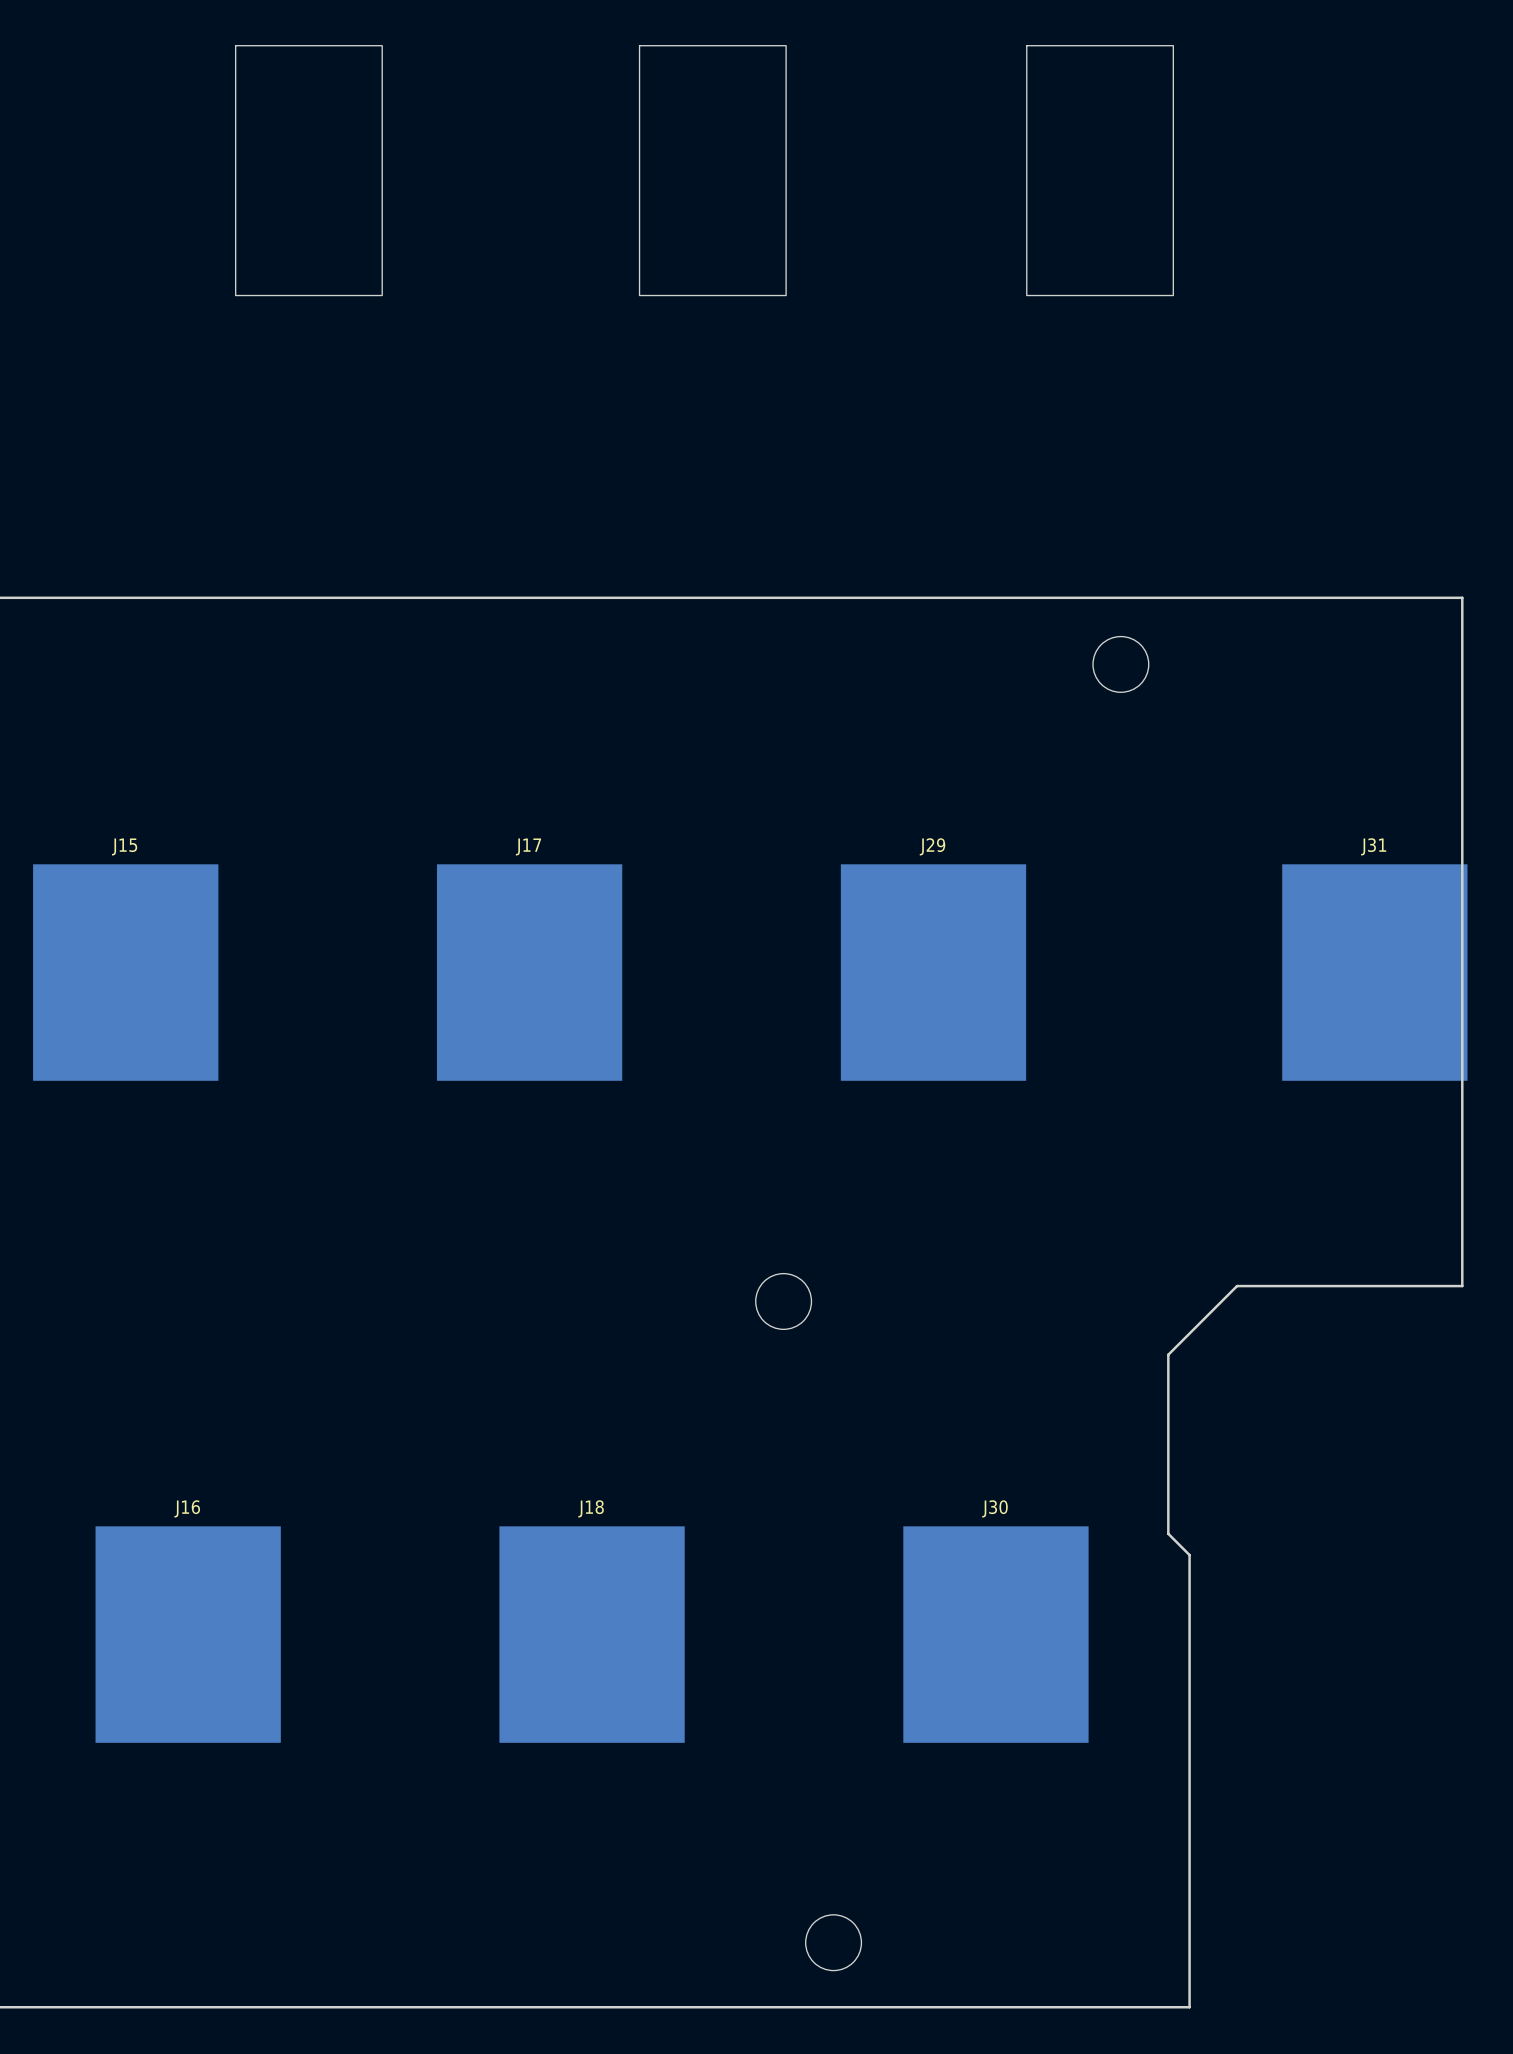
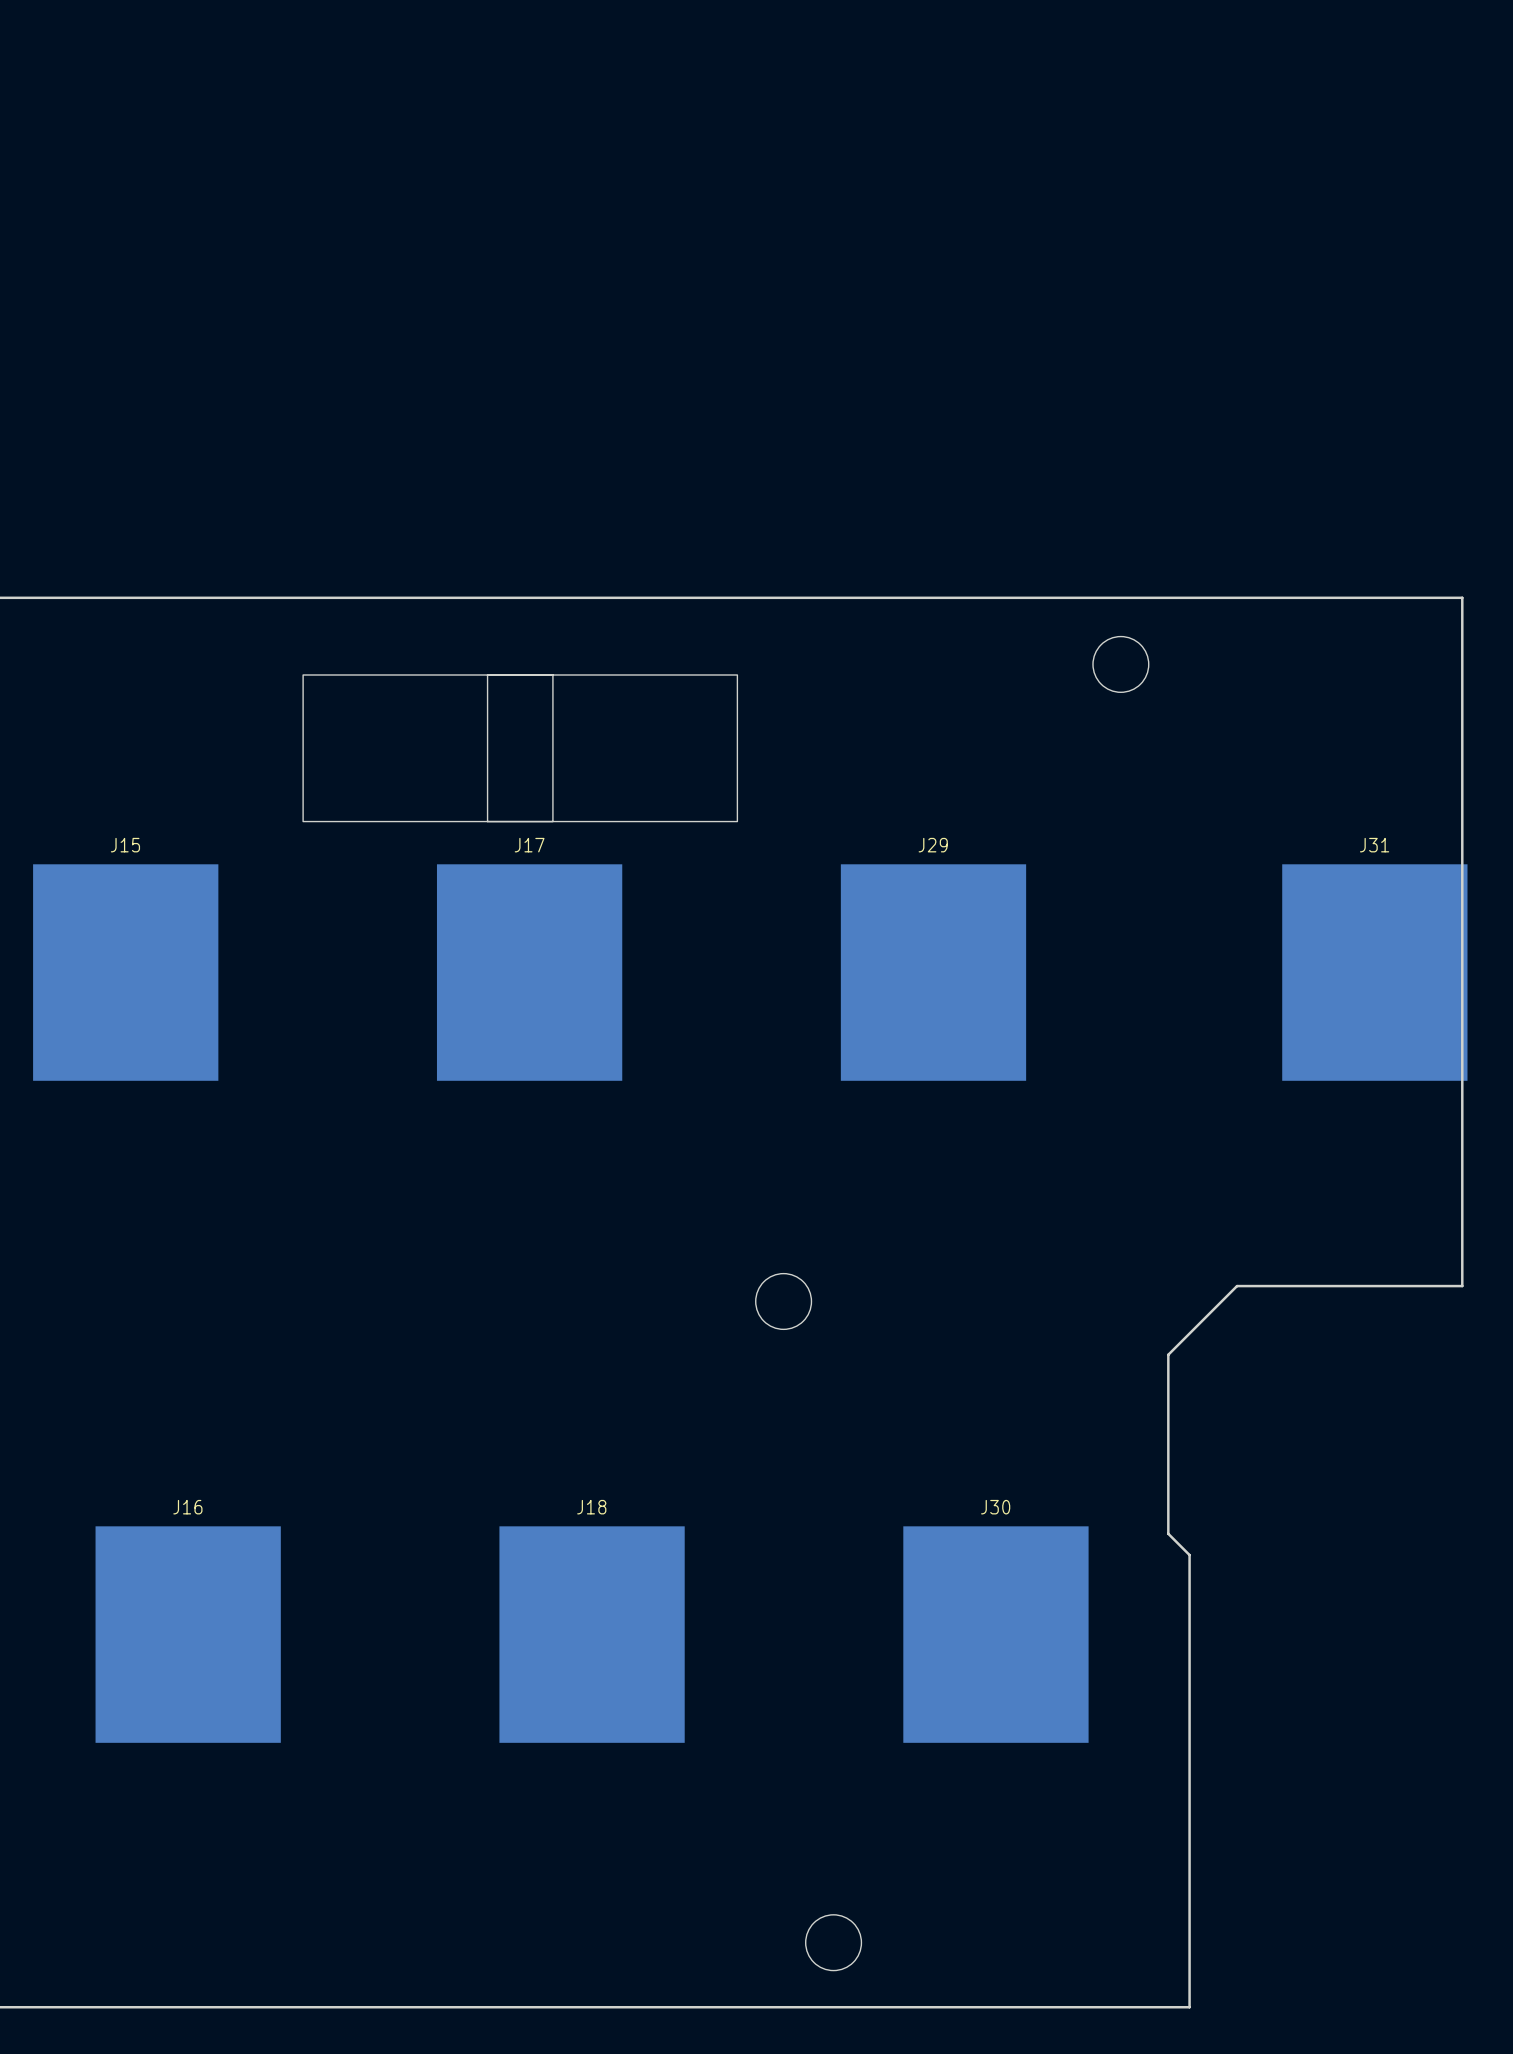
part: (308, 170) -> none
part: (712, 170) -> none
part: (1100, 170) -> none
part: none -> (428, 748)
part: none -> (612, 748)

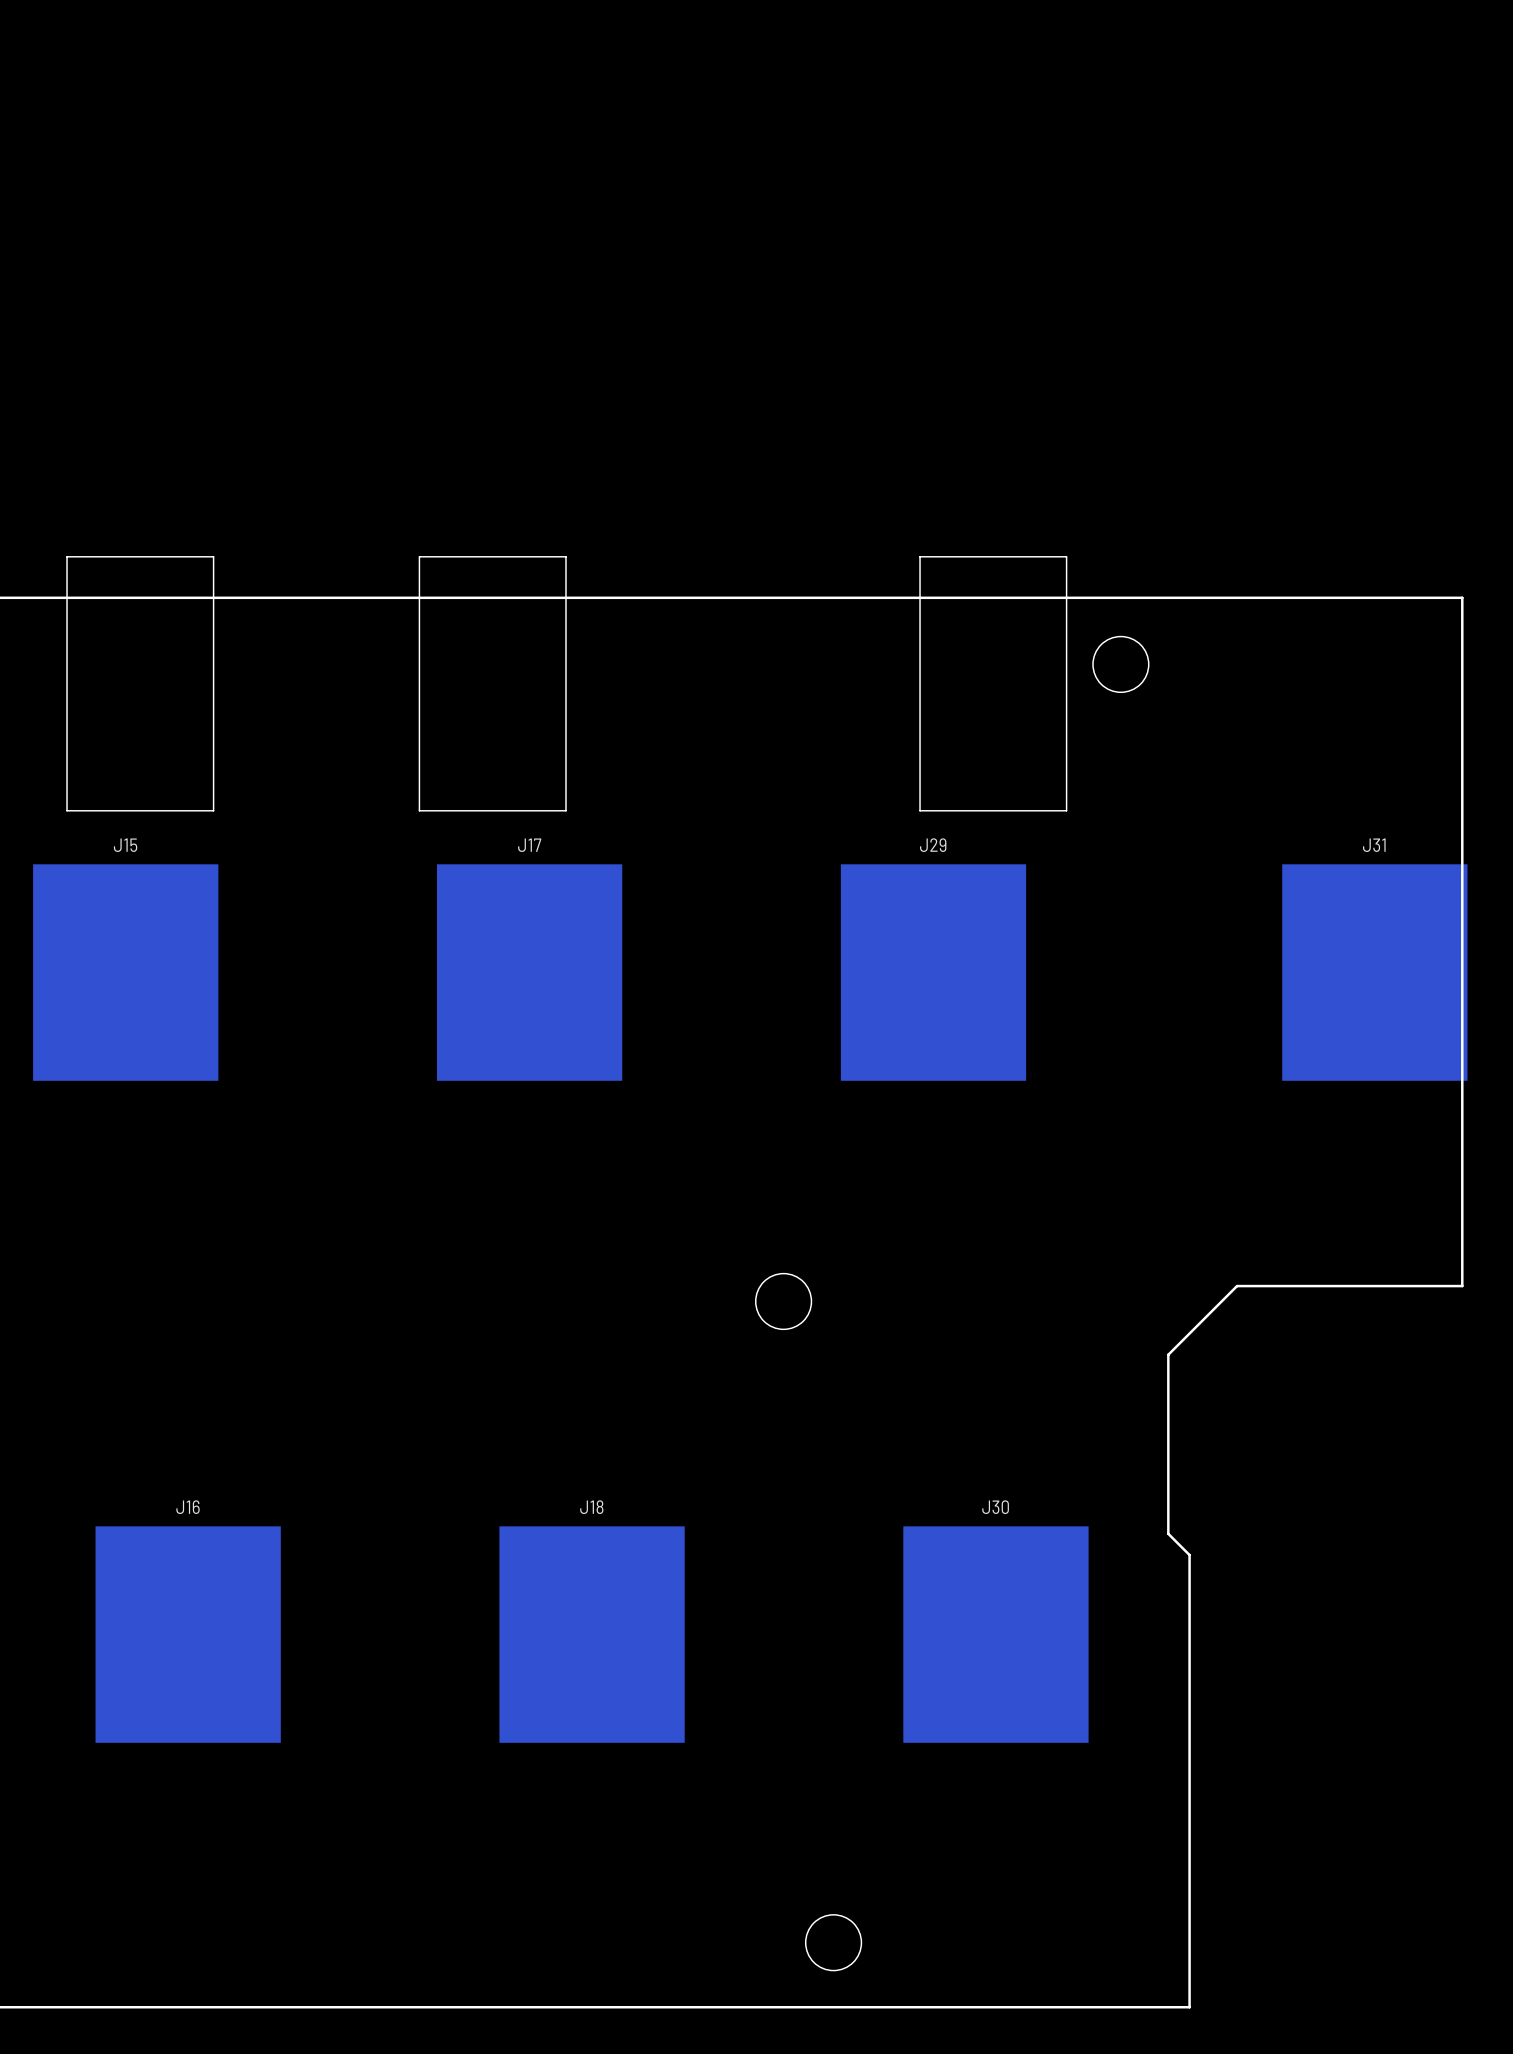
part: none -> (140, 683)
part: none -> (492, 683)
part: none -> (993, 683)
part: (428, 748) -> none
part: (612, 748) -> none

